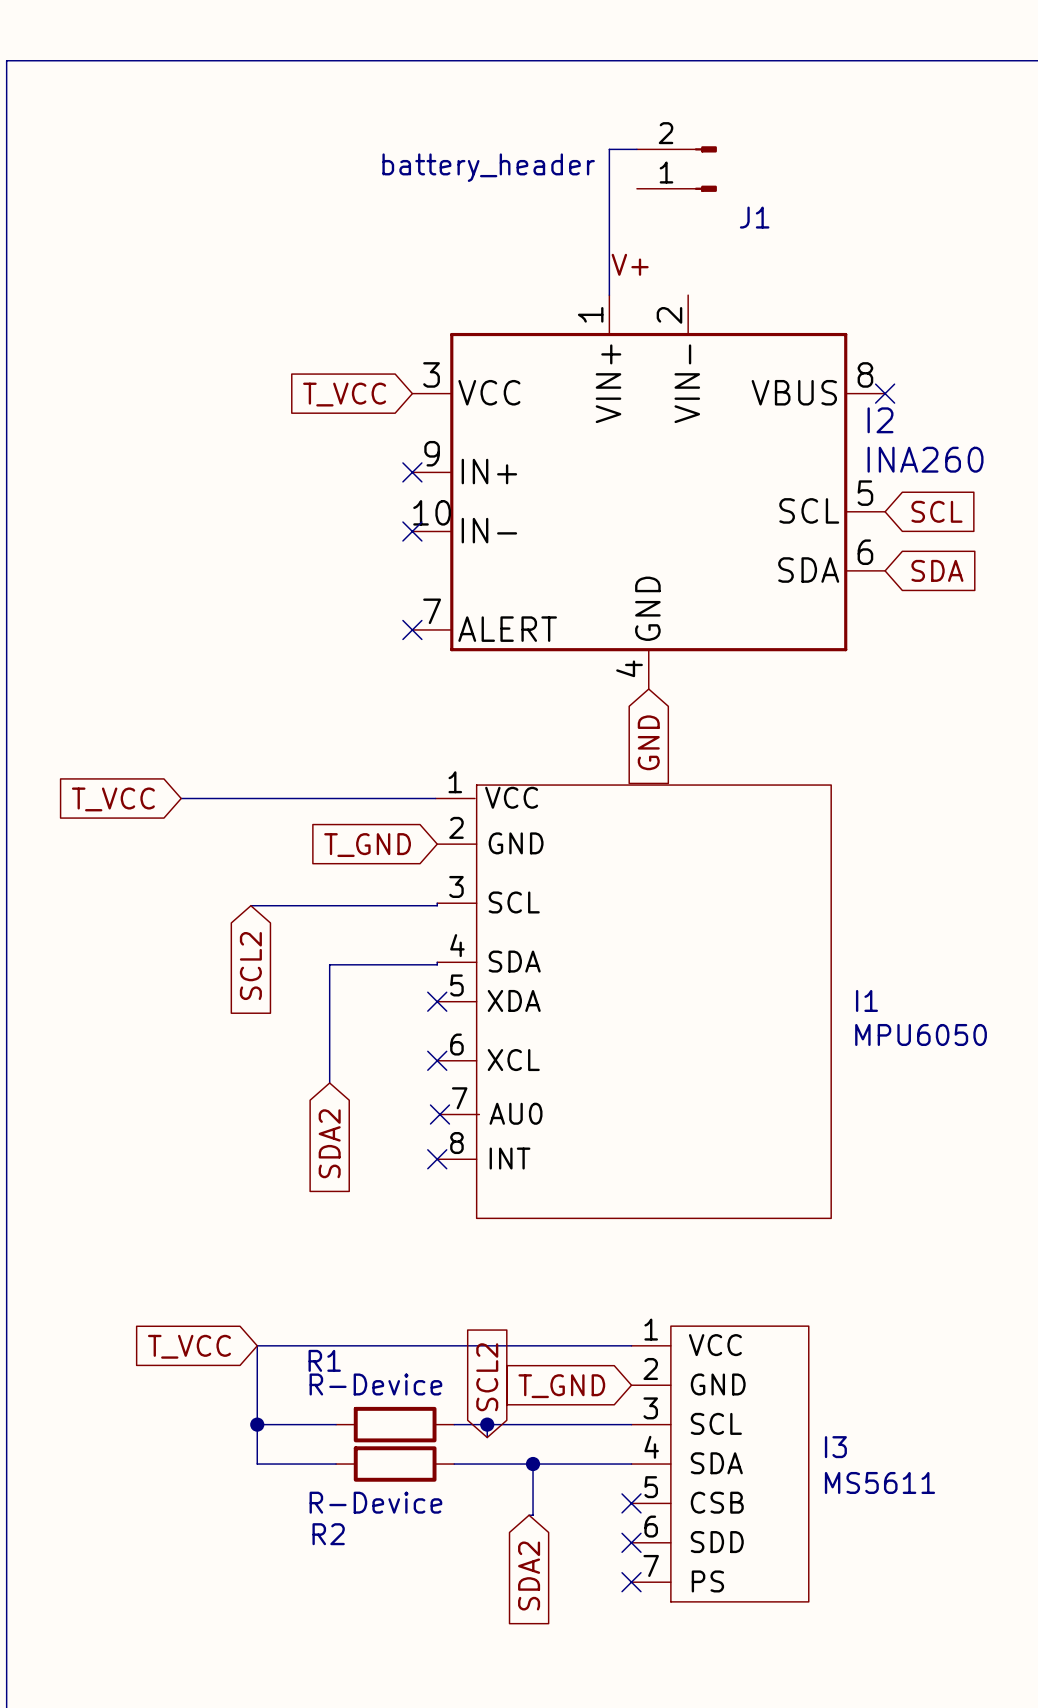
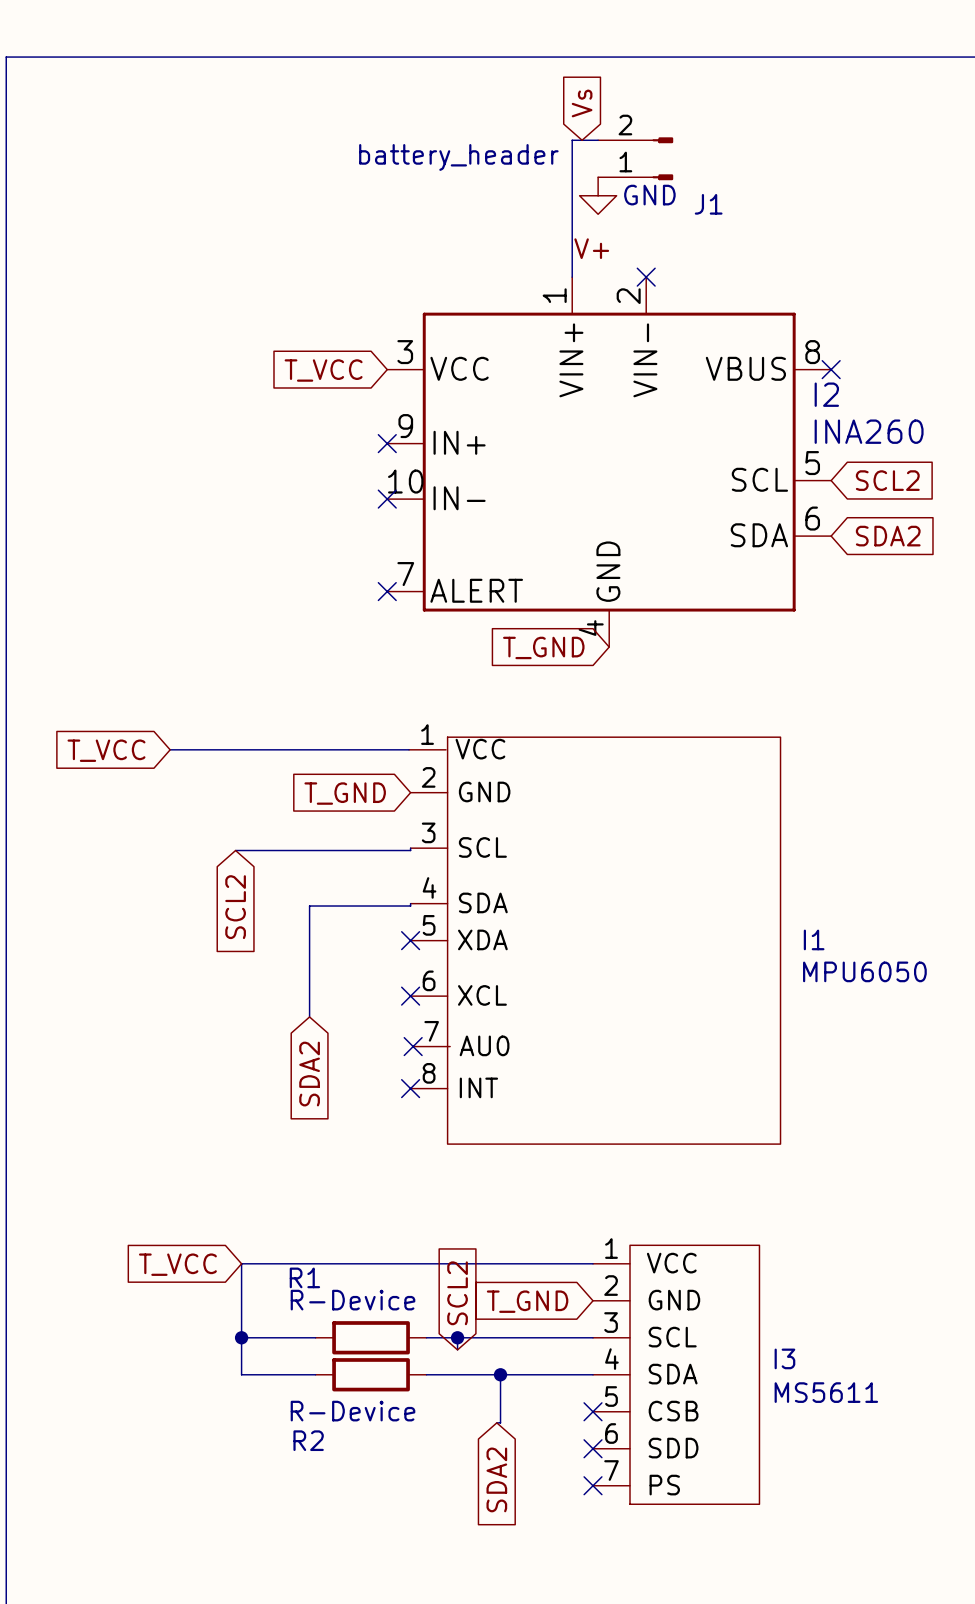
global label: none -> Vs (582, 103)
power symbol: none -> GND (598, 195)
no-connect mark: none -> (646, 277)
global label: SCL (936, 511) -> SCL2 (887, 480)
global label: SDA (937, 570) -> SDA2 (888, 536)
global label: GND (648, 742) -> T_GND (543, 647)

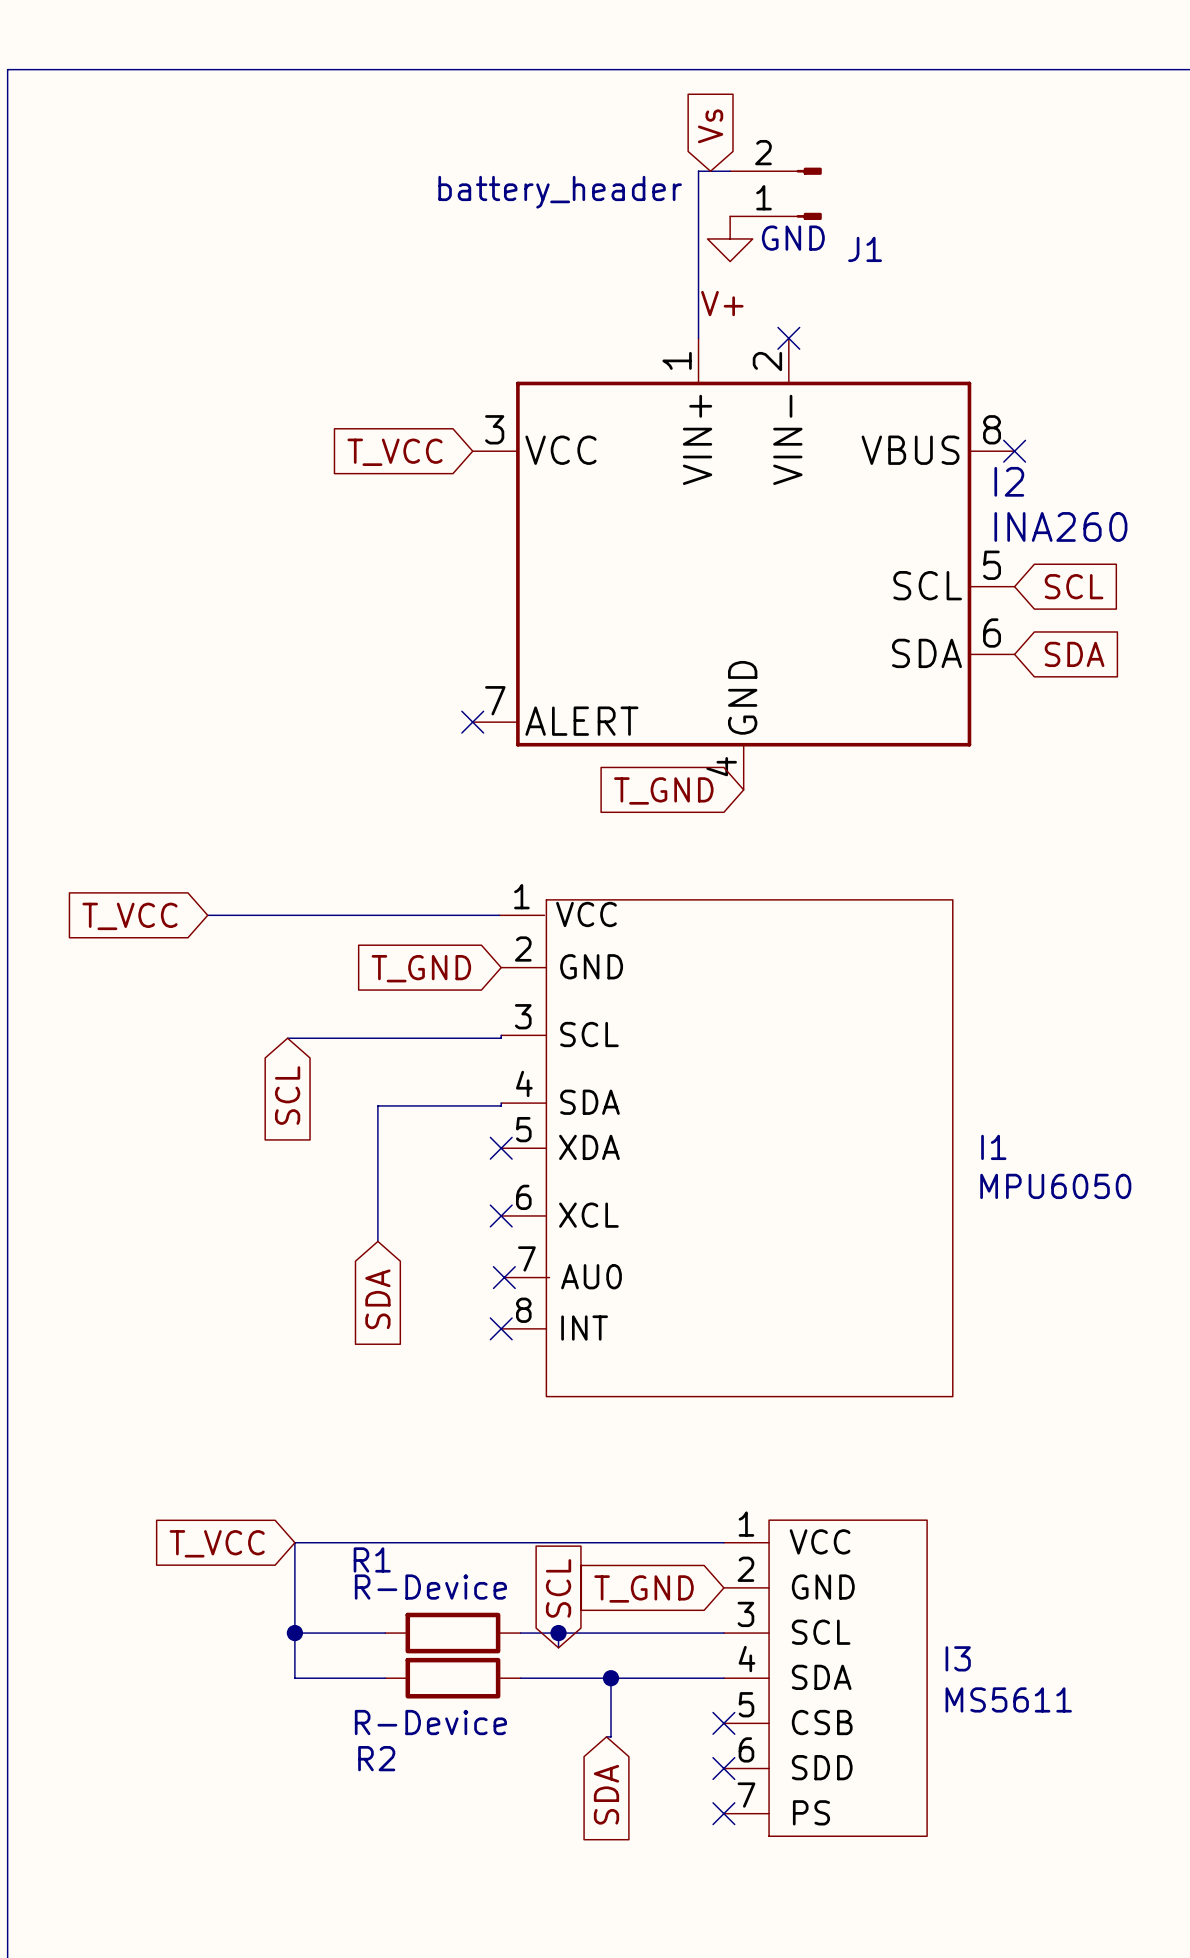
I2 symbol: [387, 277, 832, 648] -> [472, 338, 1015, 790]
no-connect mark: (387, 443) -> none
global label: SCL2 (887, 480) -> SCL (1074, 586)
no-connect mark: (387, 499) -> none
global label: SDA2 (888, 536) -> SDA (1074, 654)
global label: SCL2 (235, 907) -> SCL (287, 1095)
global label: SDA2 (309, 1074) -> SDA (377, 1299)
global label: SCL2 (457, 1293) -> SCL (558, 1588)
global label: SDA2 (496, 1479) -> SDA (606, 1794)

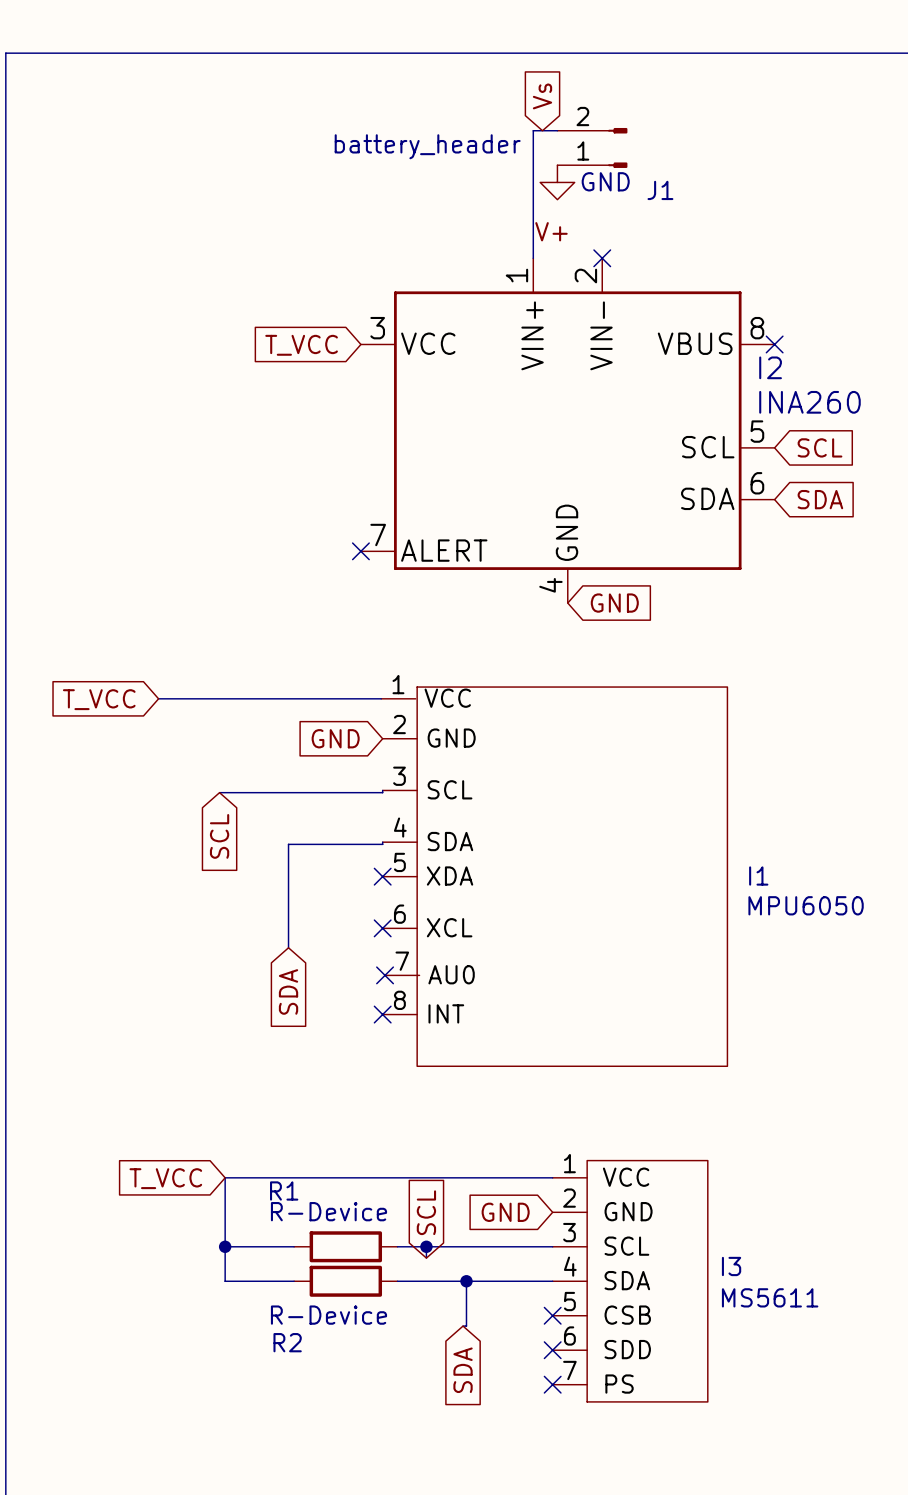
global label: T_GND (663, 790) -> GND (614, 603)
global label: T_GND (421, 968) -> GND (335, 738)
global label: T_GND (644, 1588) -> GND (505, 1212)

